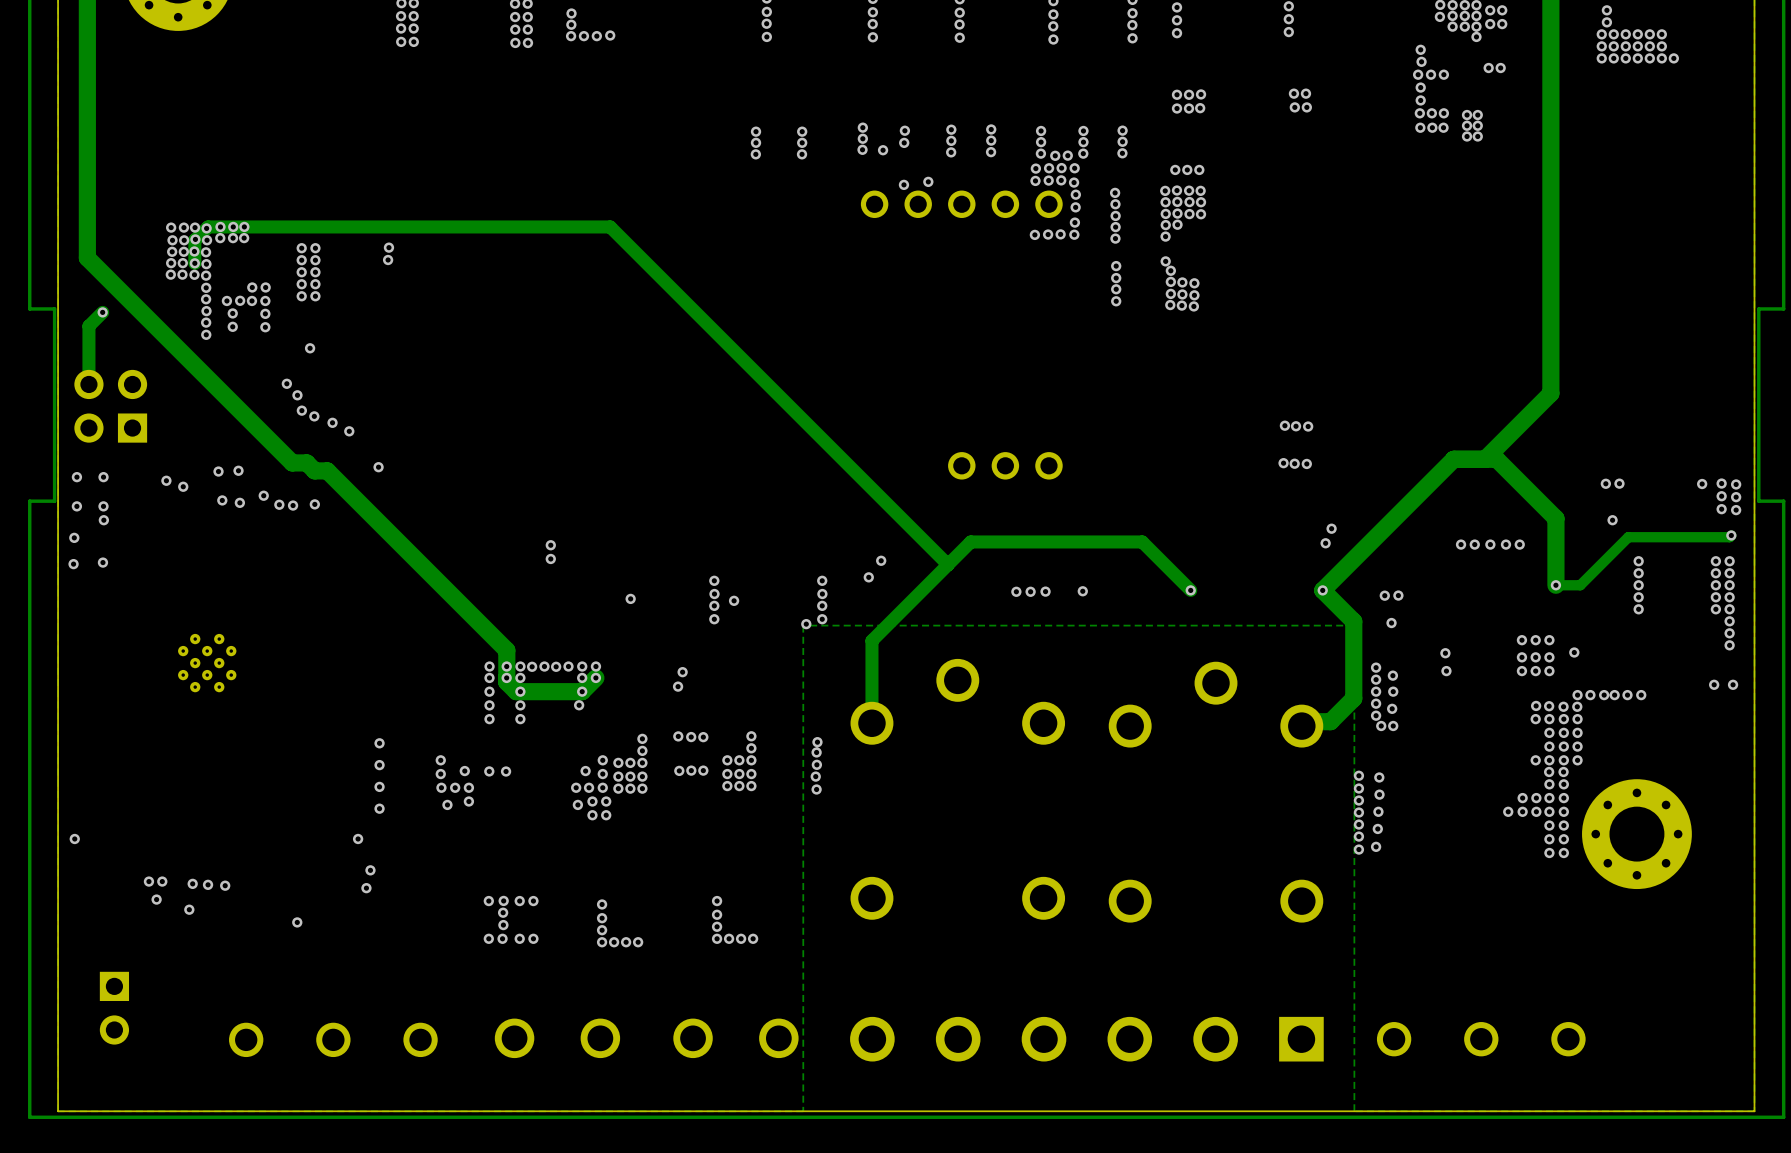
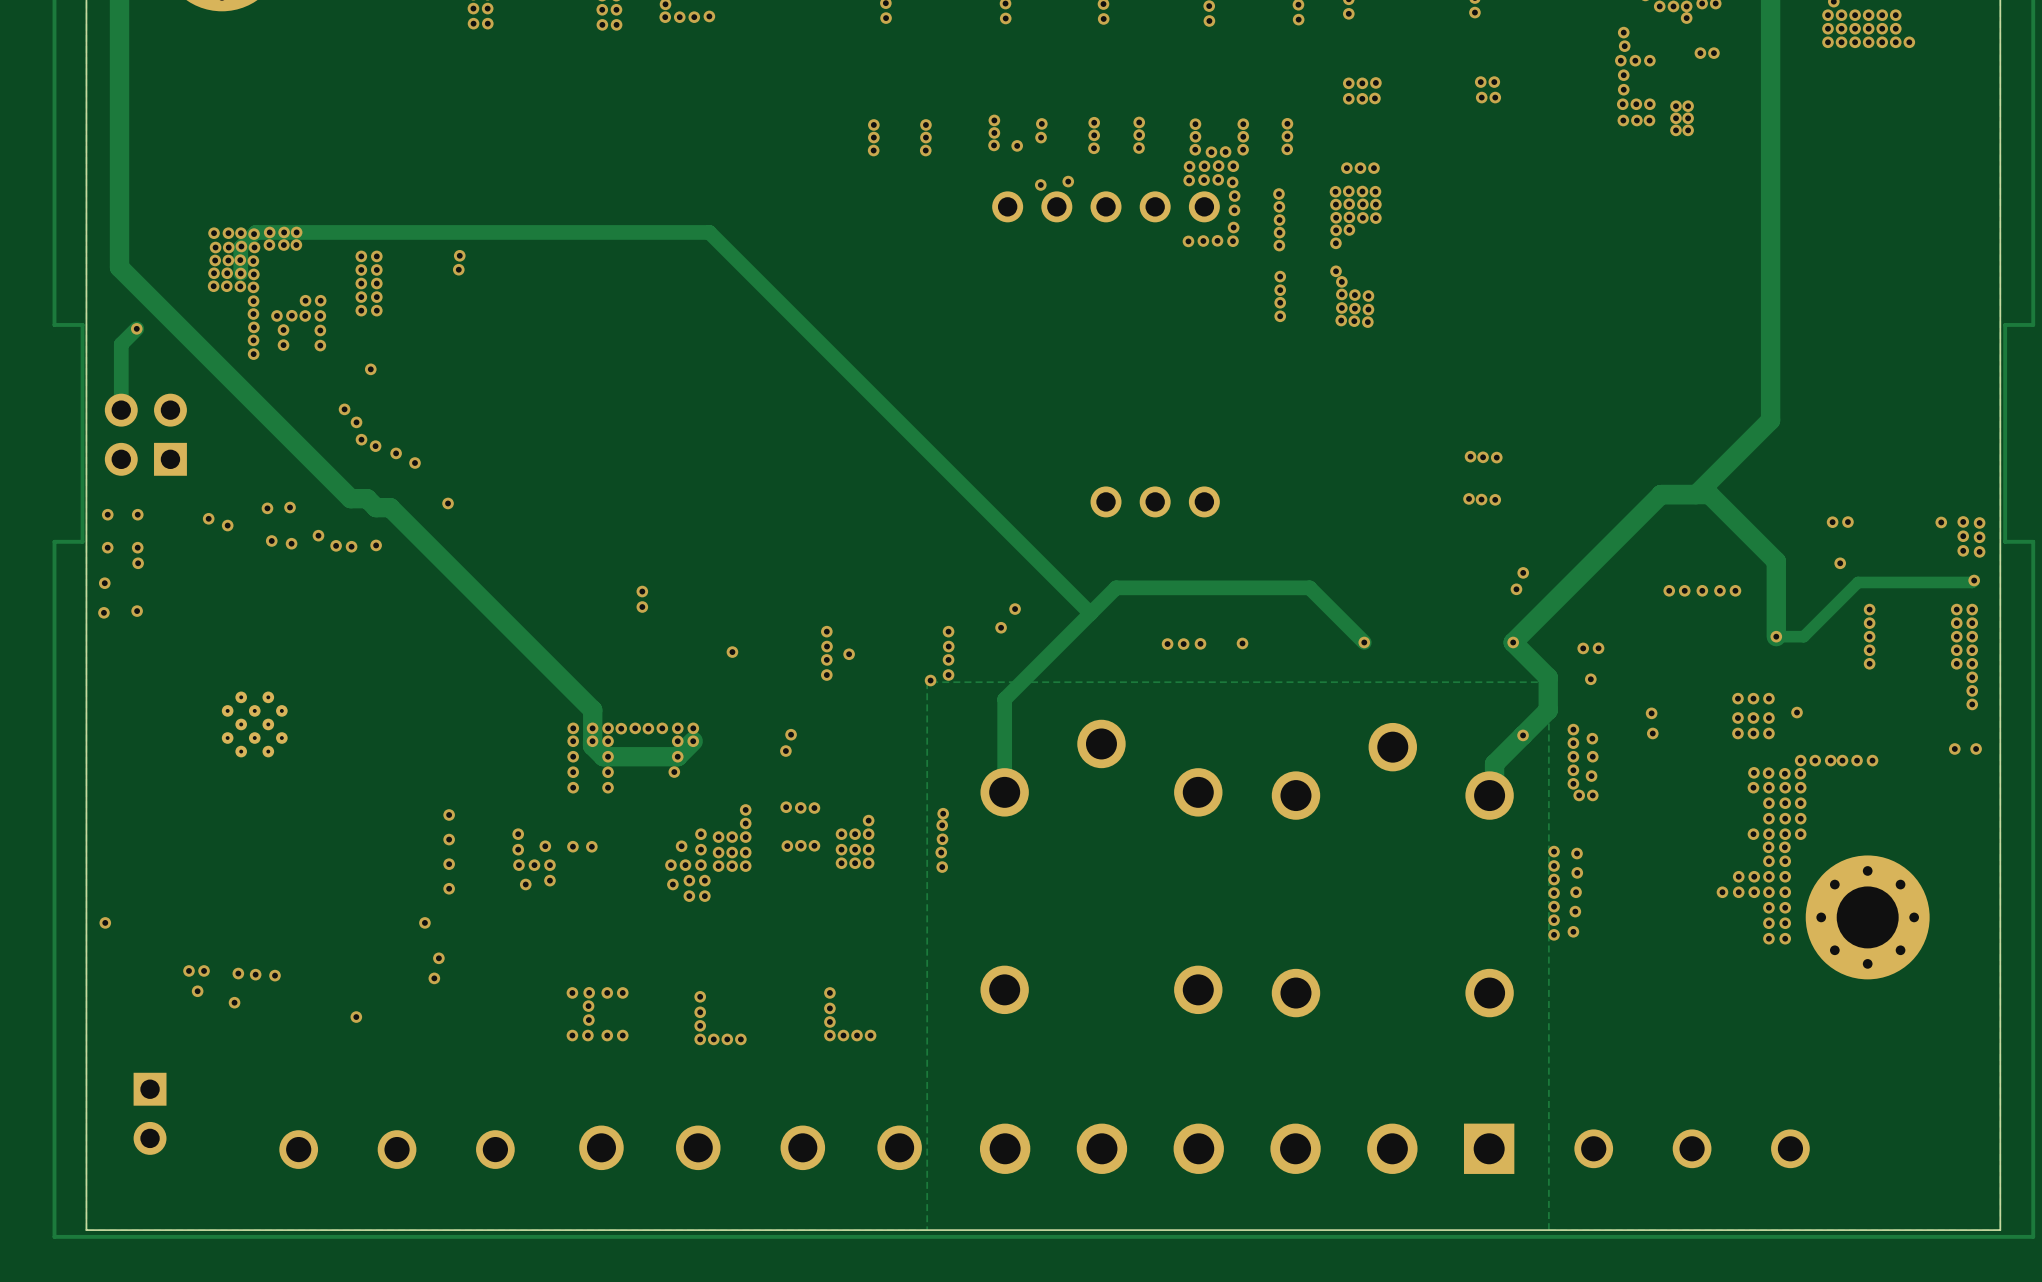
track: (1353, 650) (1353, 698) (1330, 721) (1306, 721) -> (1548, 710) (1494, 763) (1494, 790)
via: none -> (1523, 735)
via: (751, 736) -> none

